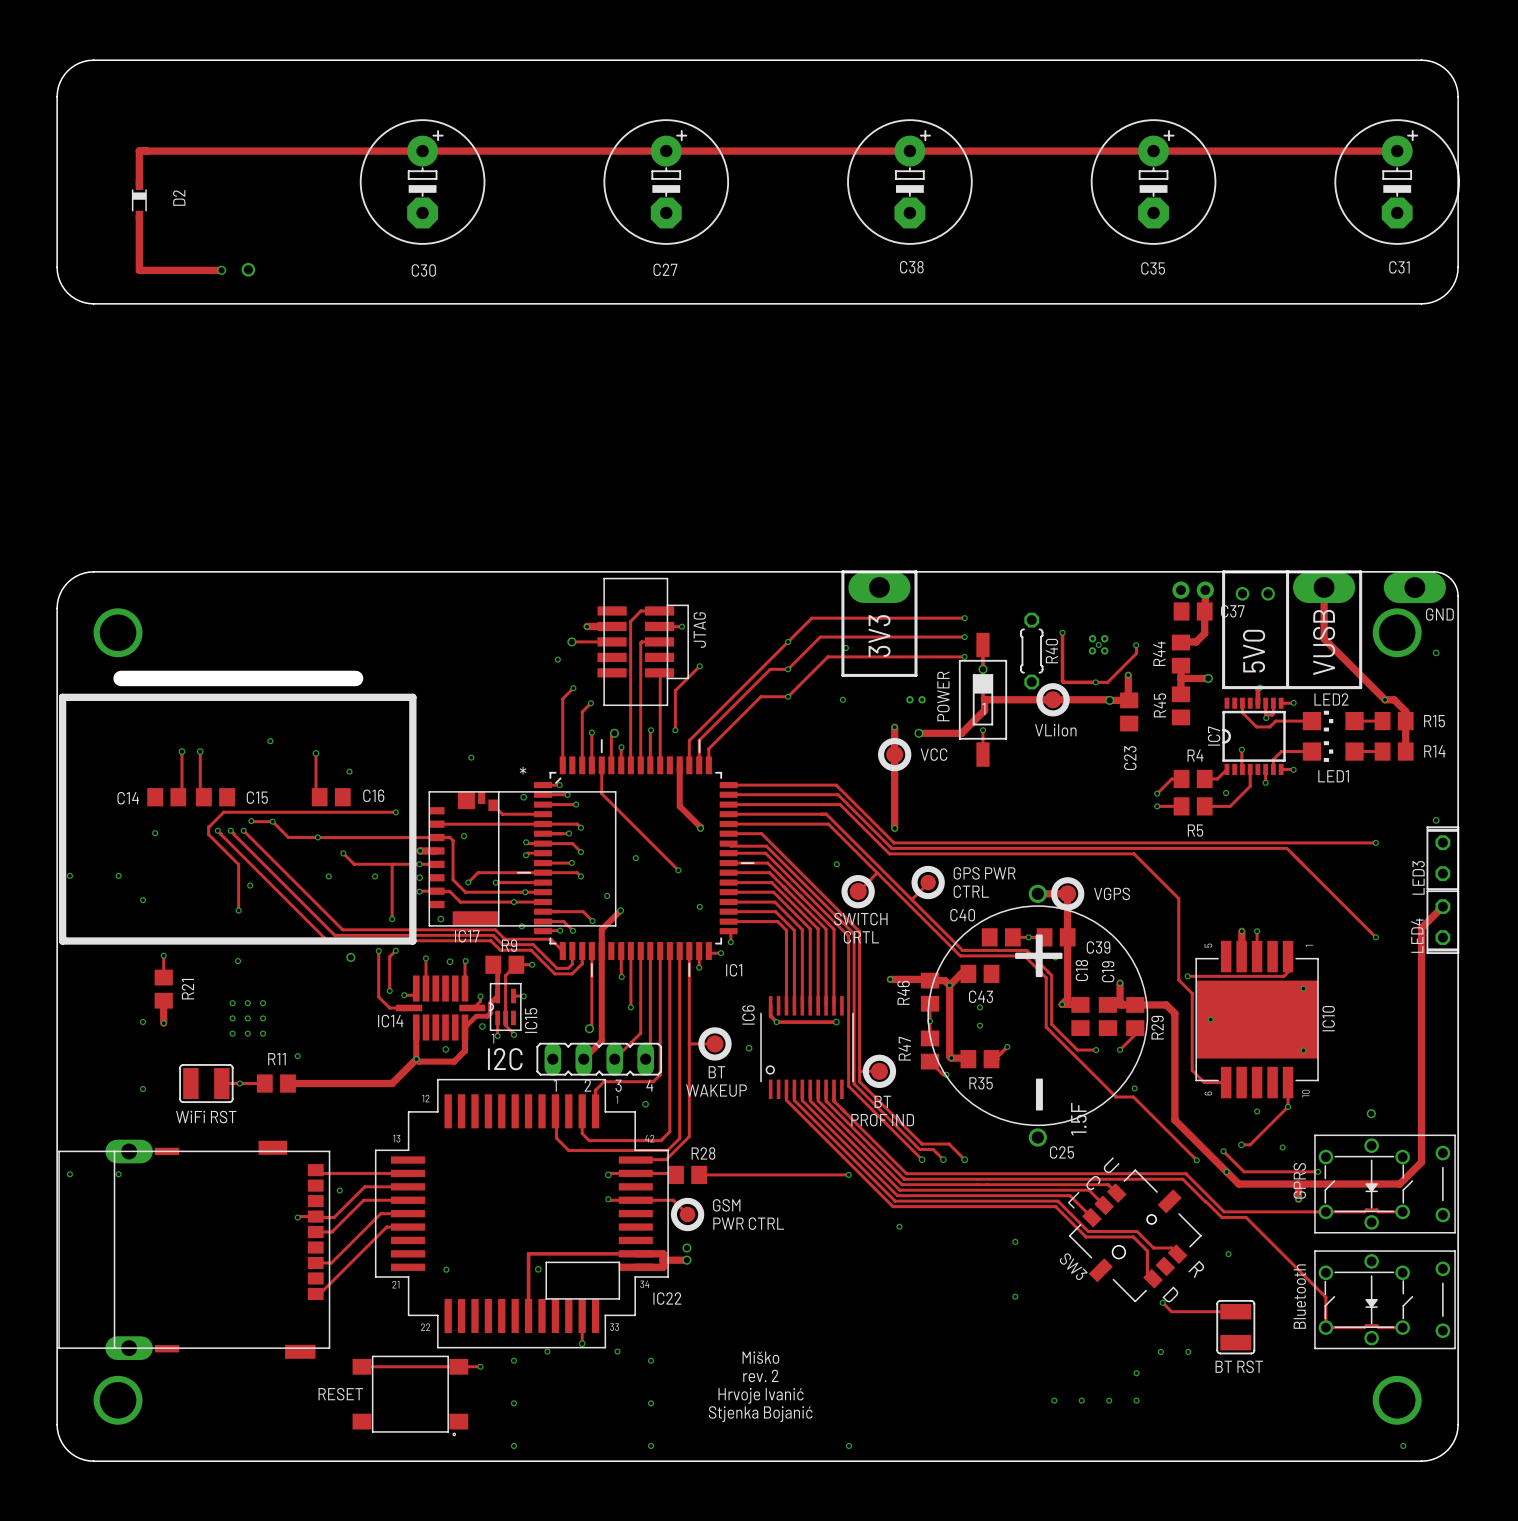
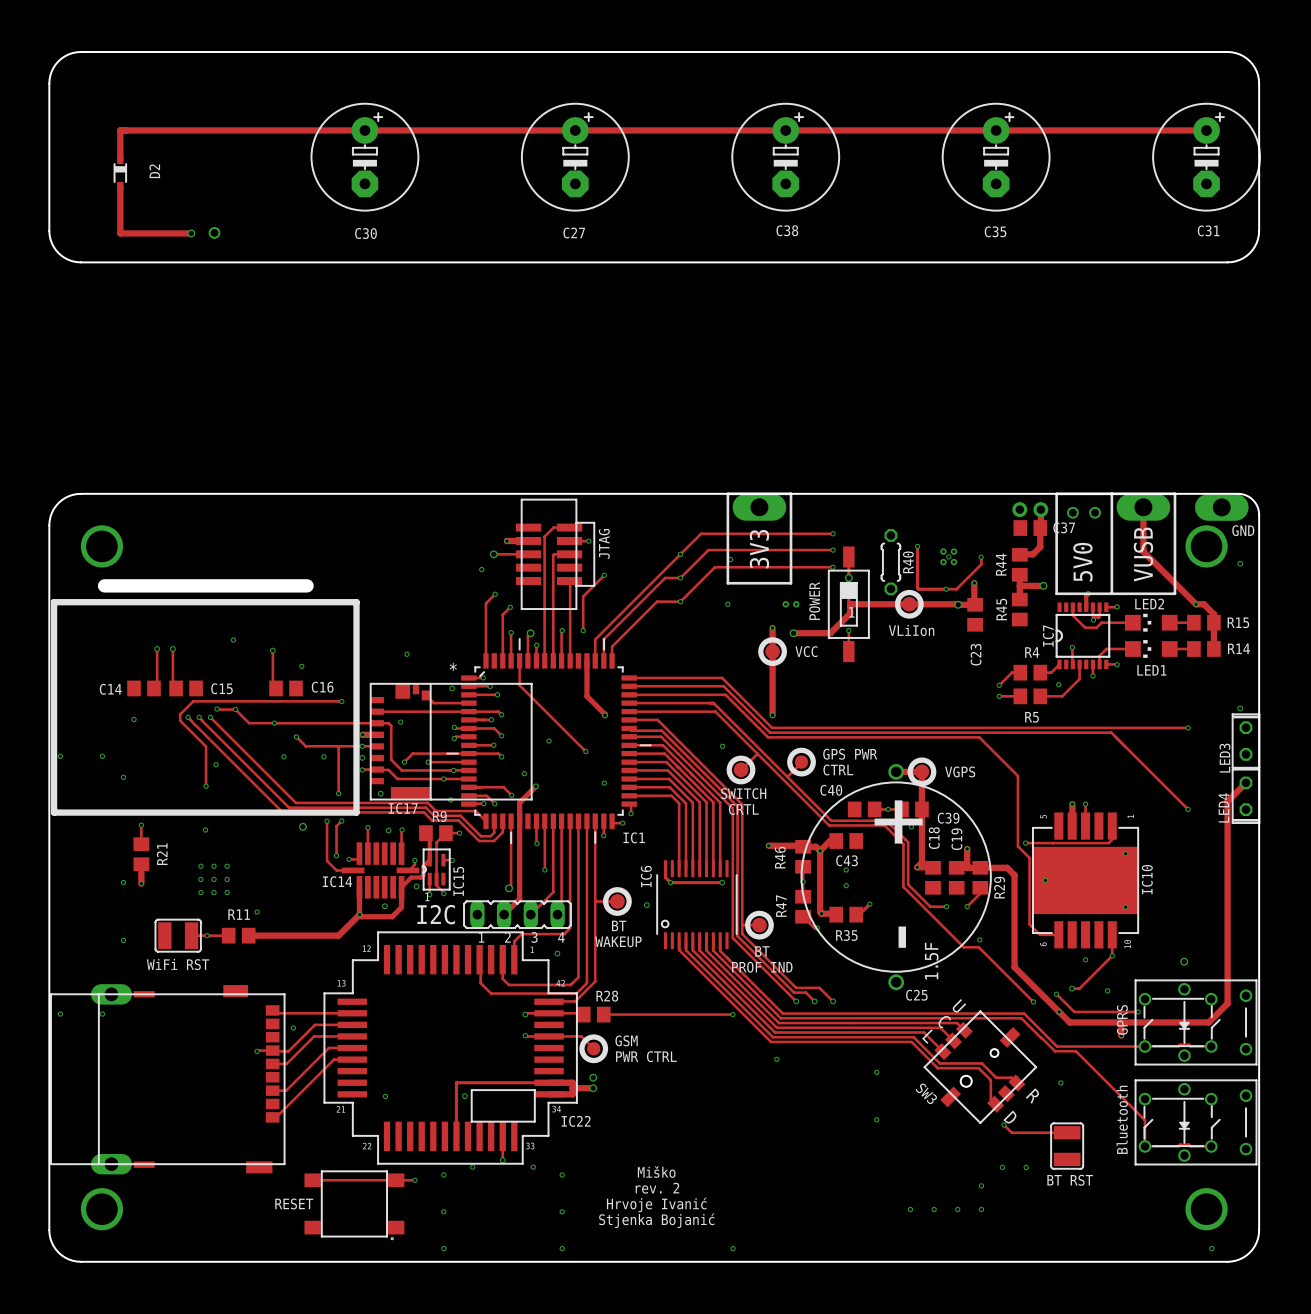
SW3 footprint: [1068, 1169, 1202, 1303] -> [923, 1010, 1037, 1124]

